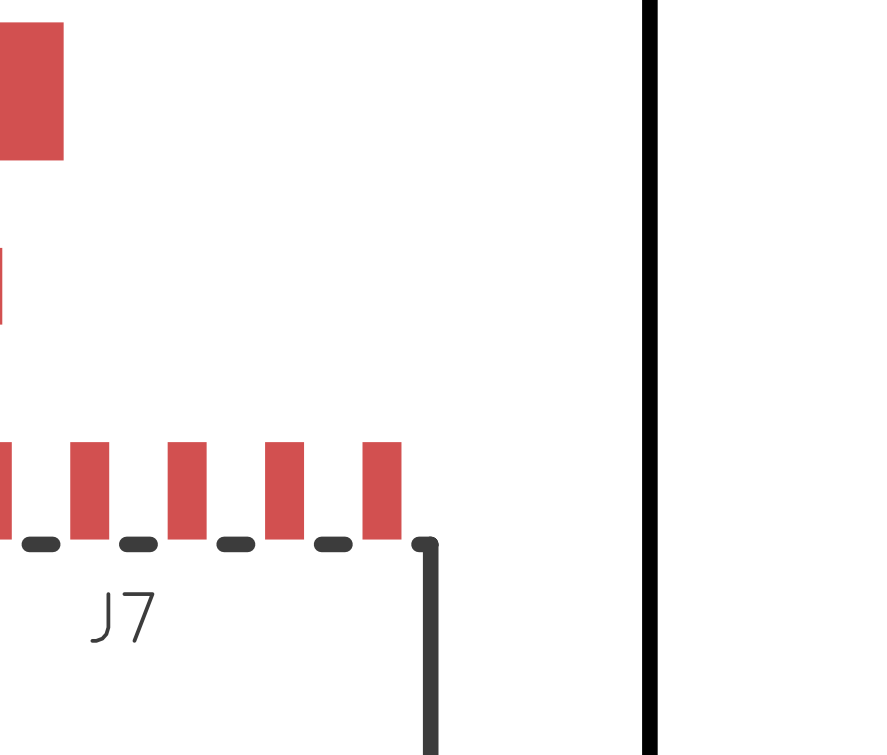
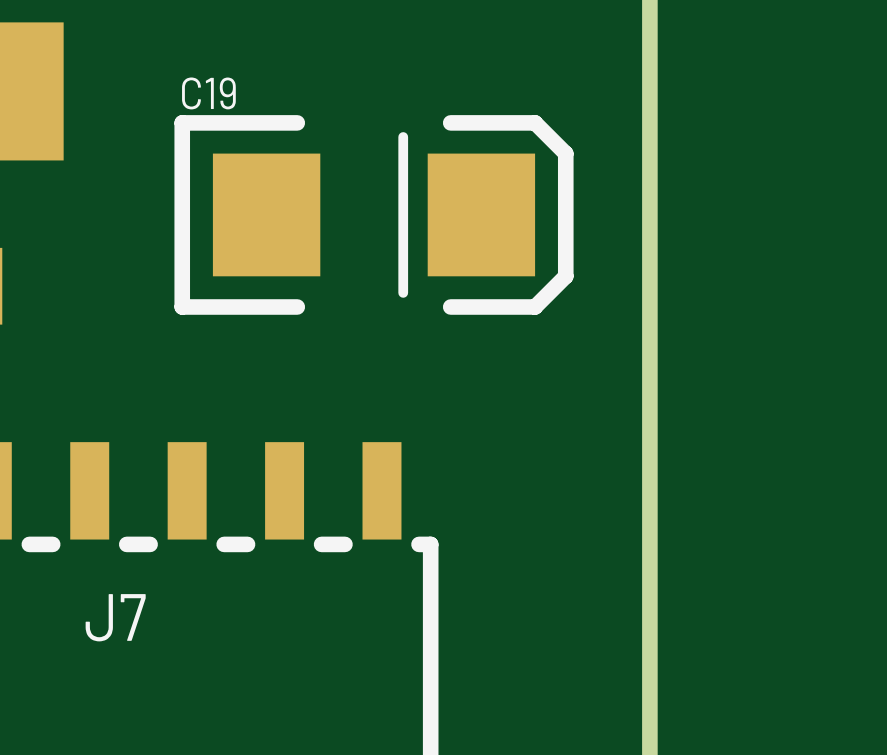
C19: none -> (374, 214)

